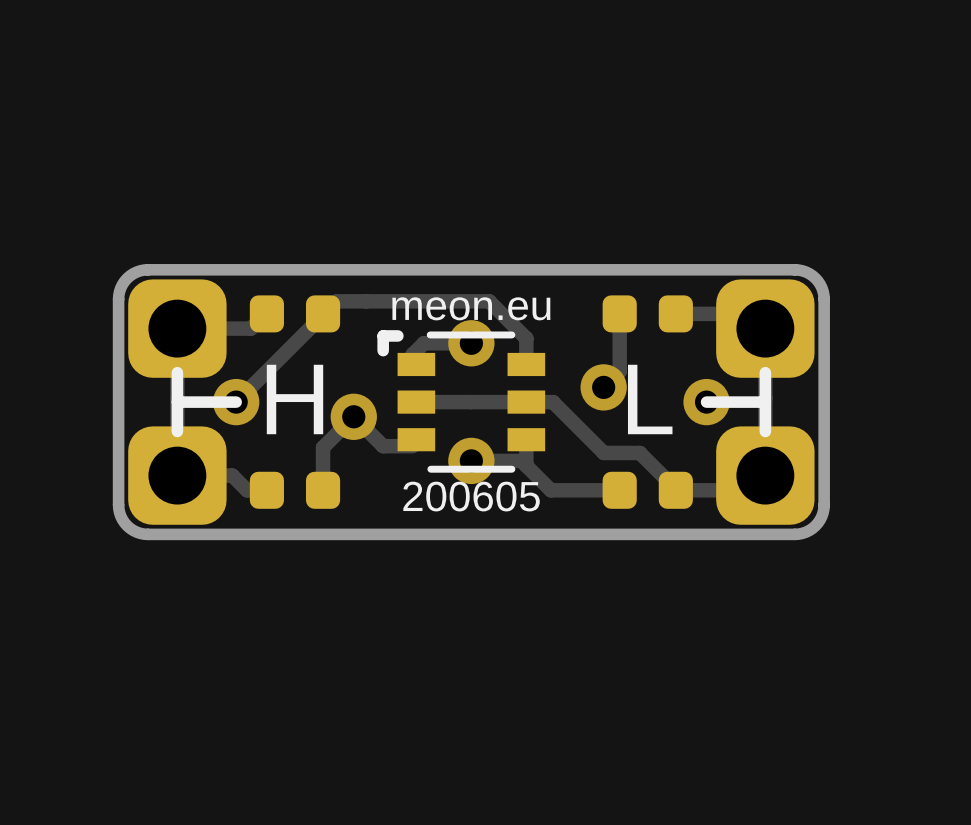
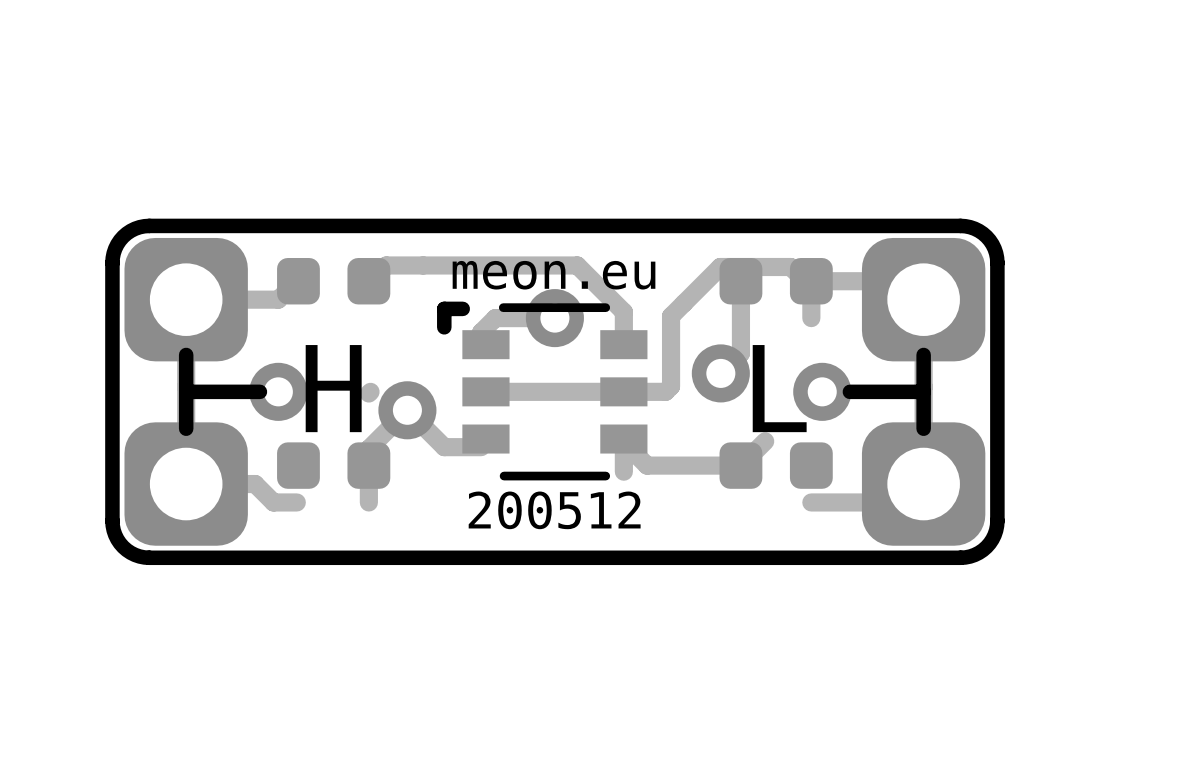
track: (323, 313) (236, 402) -> none
via position: (236, 402) -> (278, 391)
track: none -> (370, 391) (368, 393)
track: (552, 402) (603, 452) (639, 452) (677, 490) -> (657, 391) (665, 391) (671, 386) (671, 316) (720, 267) (790, 267) (811, 287) (811, 318)
via position: (706, 402) -> (822, 391)
track: none -> (765, 441) (740, 465) (647, 465) (628, 447)
track: (471, 460) (521, 460) (550, 490) (618, 490) -> none
via: (471, 460) -> none
part position: (294, 490) -> (333, 465)
part position: (647, 490) -> (776, 465)
text: 200605 (471, 496) -> 200512 (554, 510)

